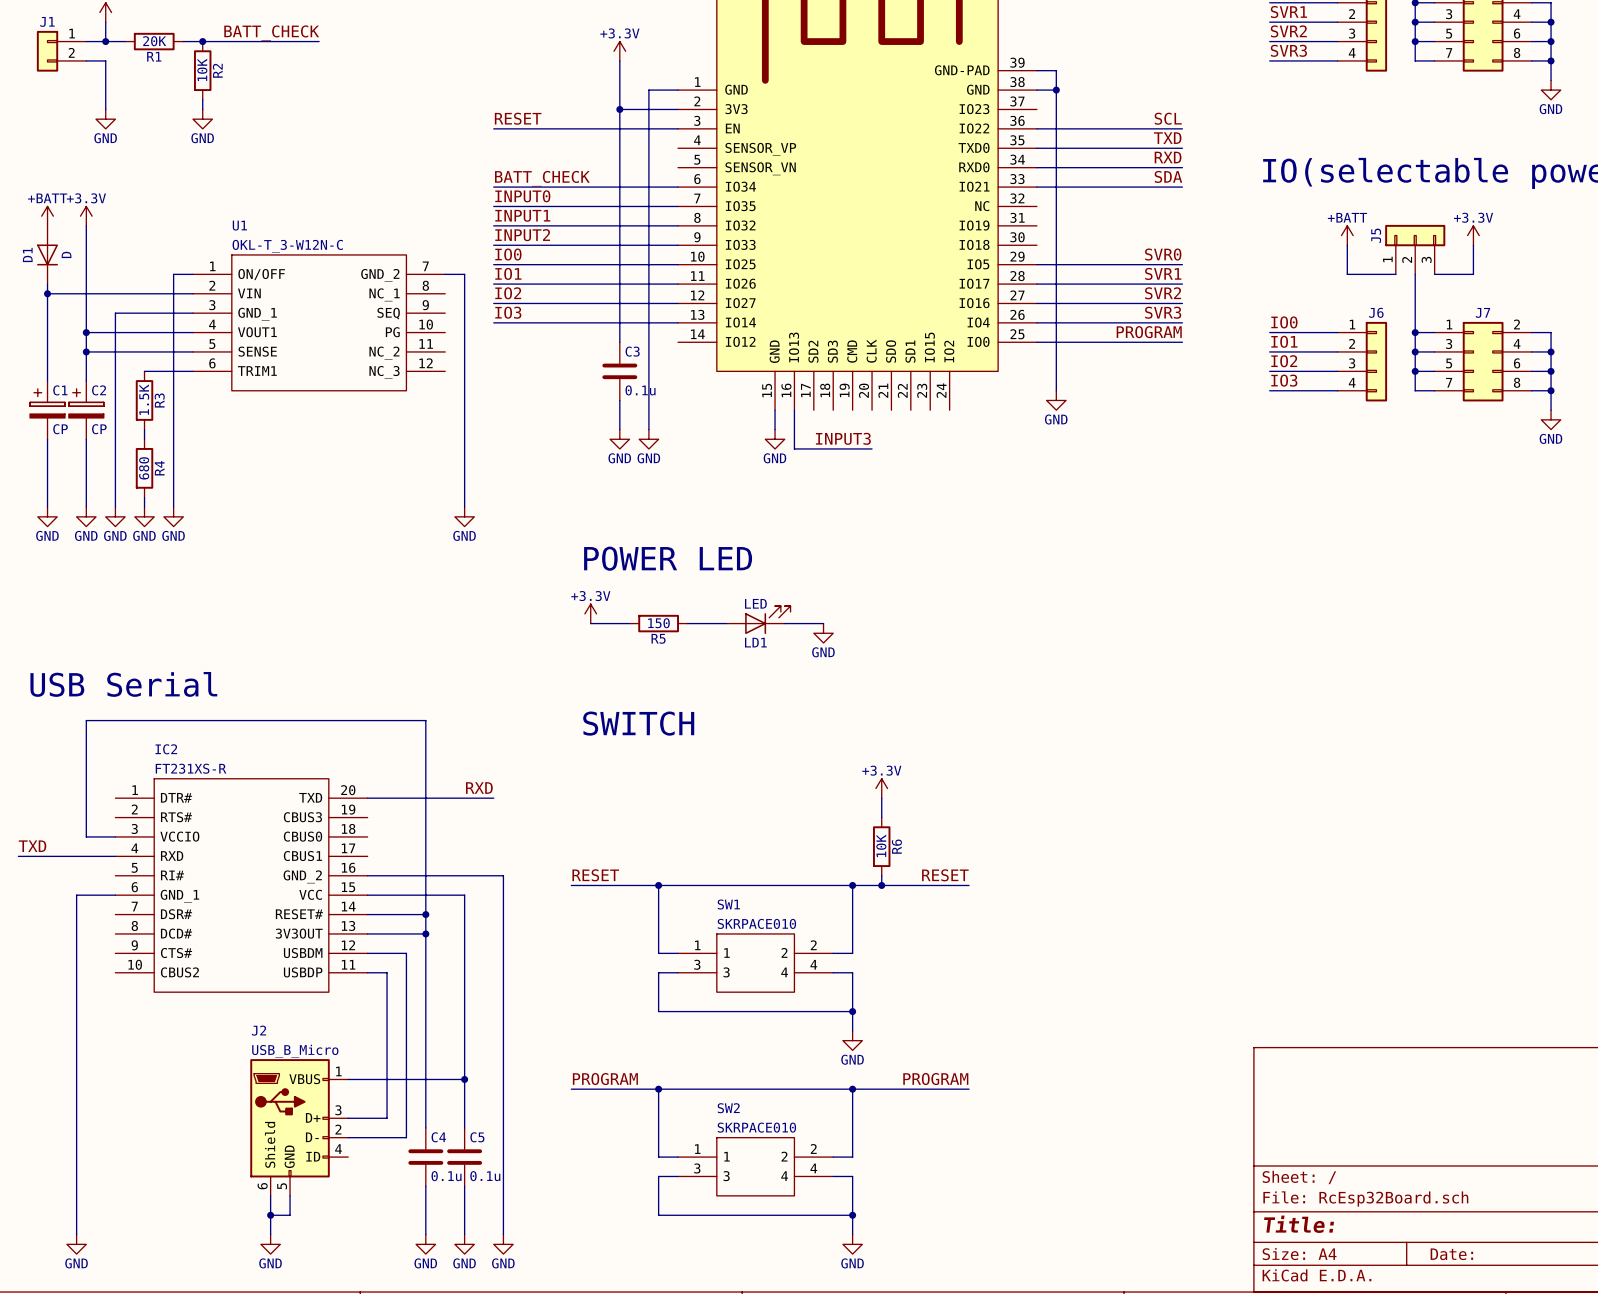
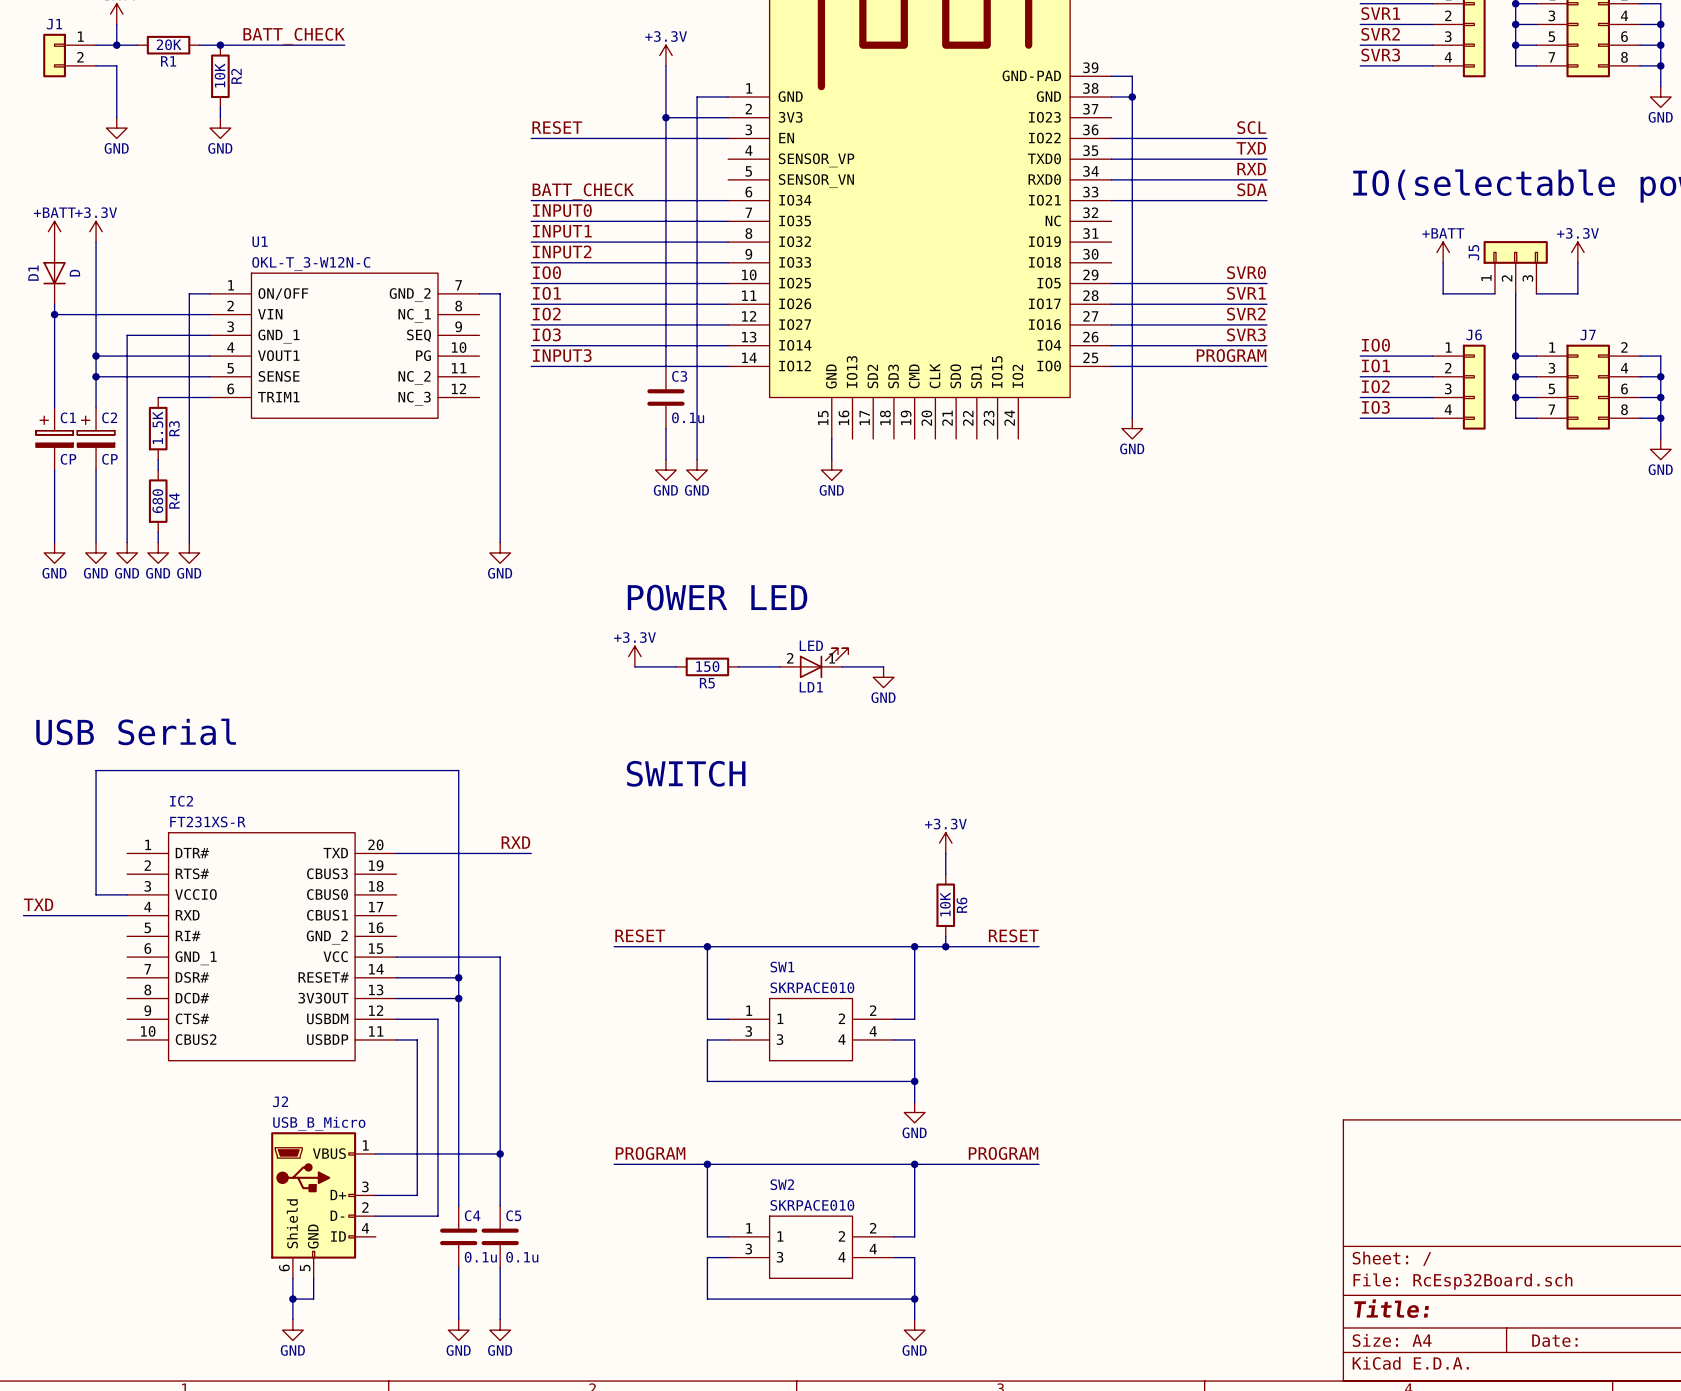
label: none -> INPUT3 (562, 355)
wire: none -> (531, 366) (728, 366)
wire: (794, 410) (794, 448) (872, 448) -> none
label: INPUT3 (843, 438) -> none
LD1 pin number: none -> 2 (790, 658)
LD1 pin number: none -> 1 (832, 658)
wire: (367, 875) (503, 875) (503, 1234) -> none
wire: (115, 895) (76, 895) (76, 1234) -> none
power symbol: GND (76, 1244) -> none
power symbol: GND (503, 1244) -> none

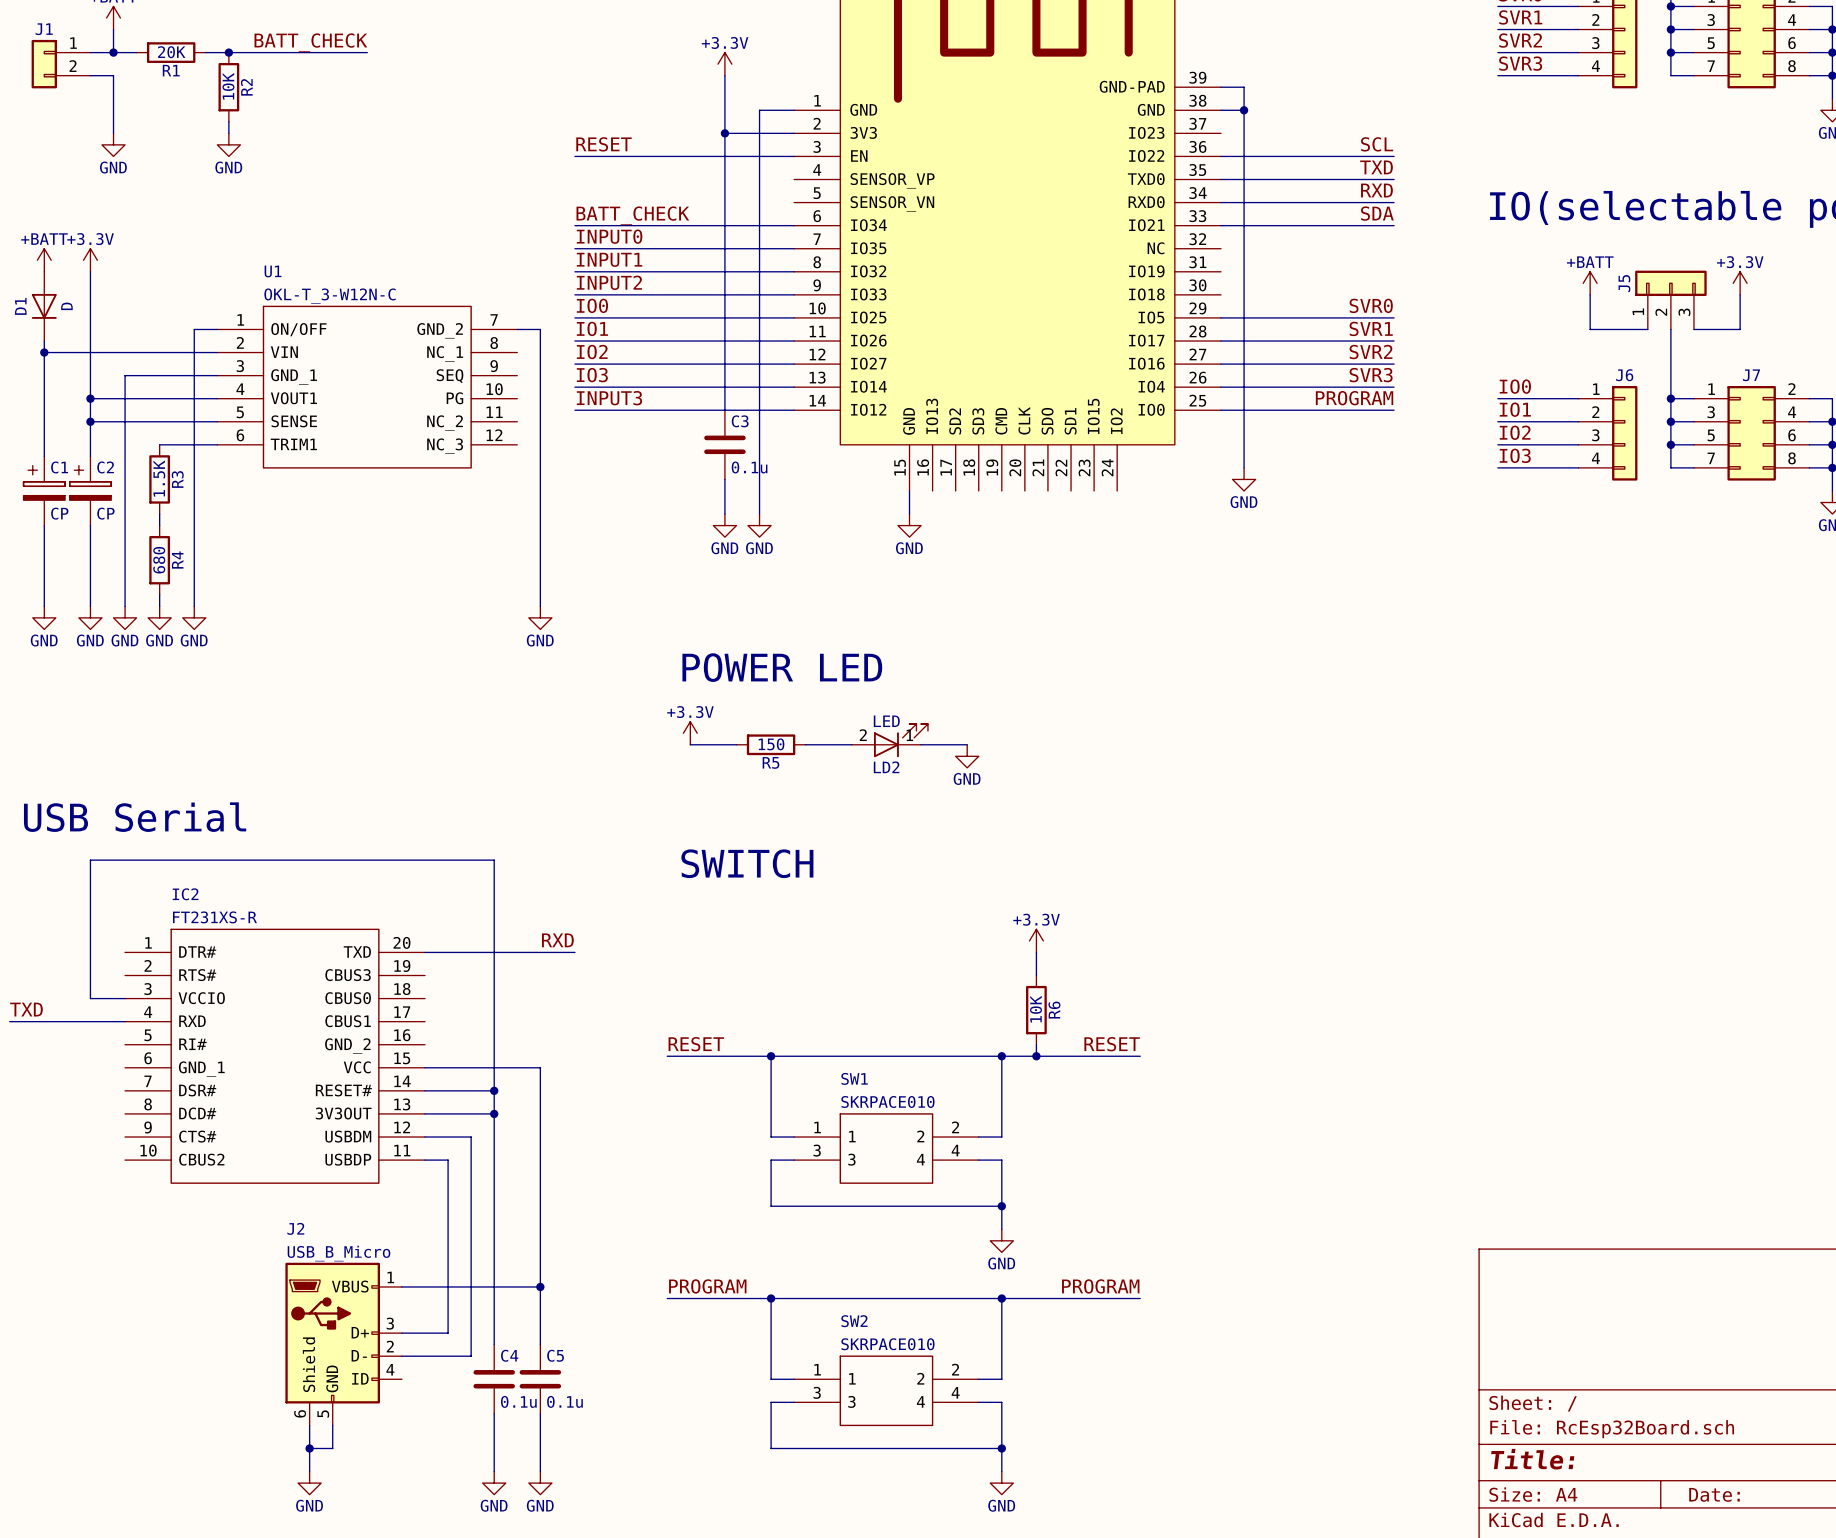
LD1 name: LD1 (811, 687) -> LD2 (886, 767)

